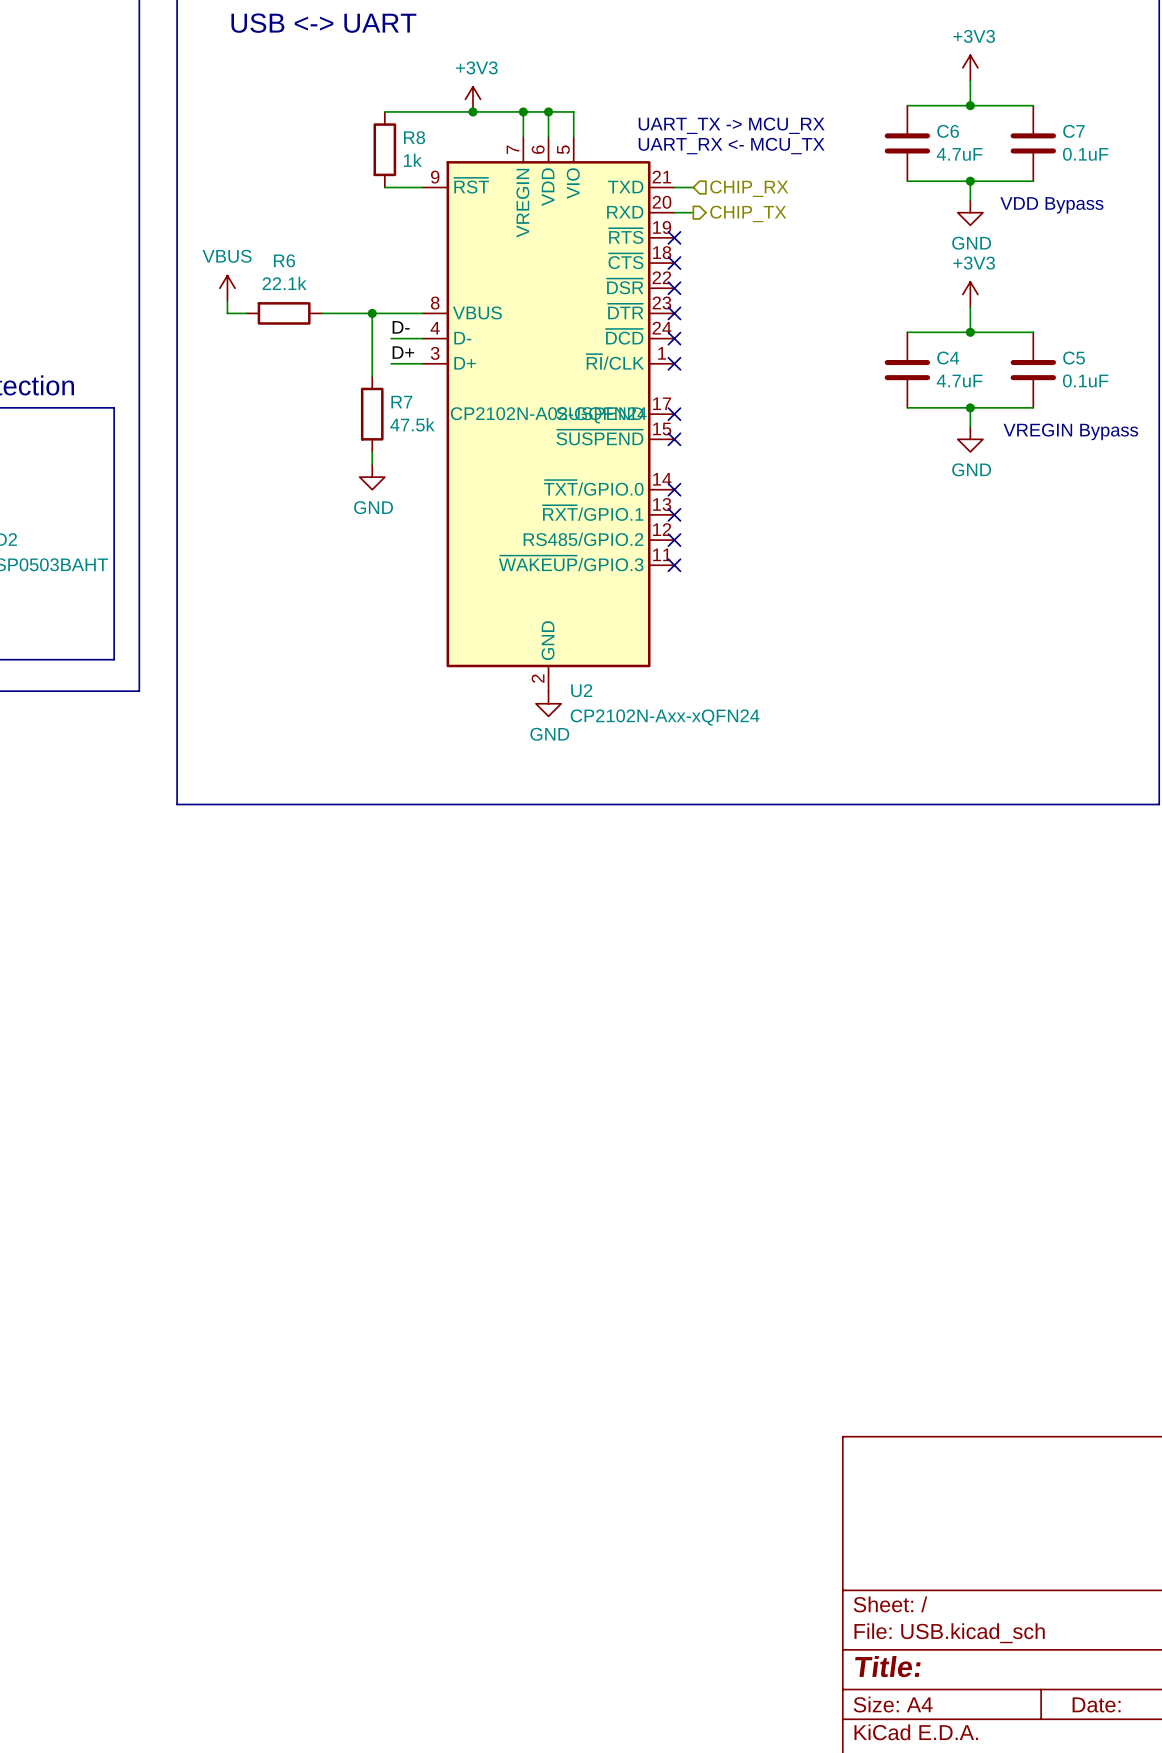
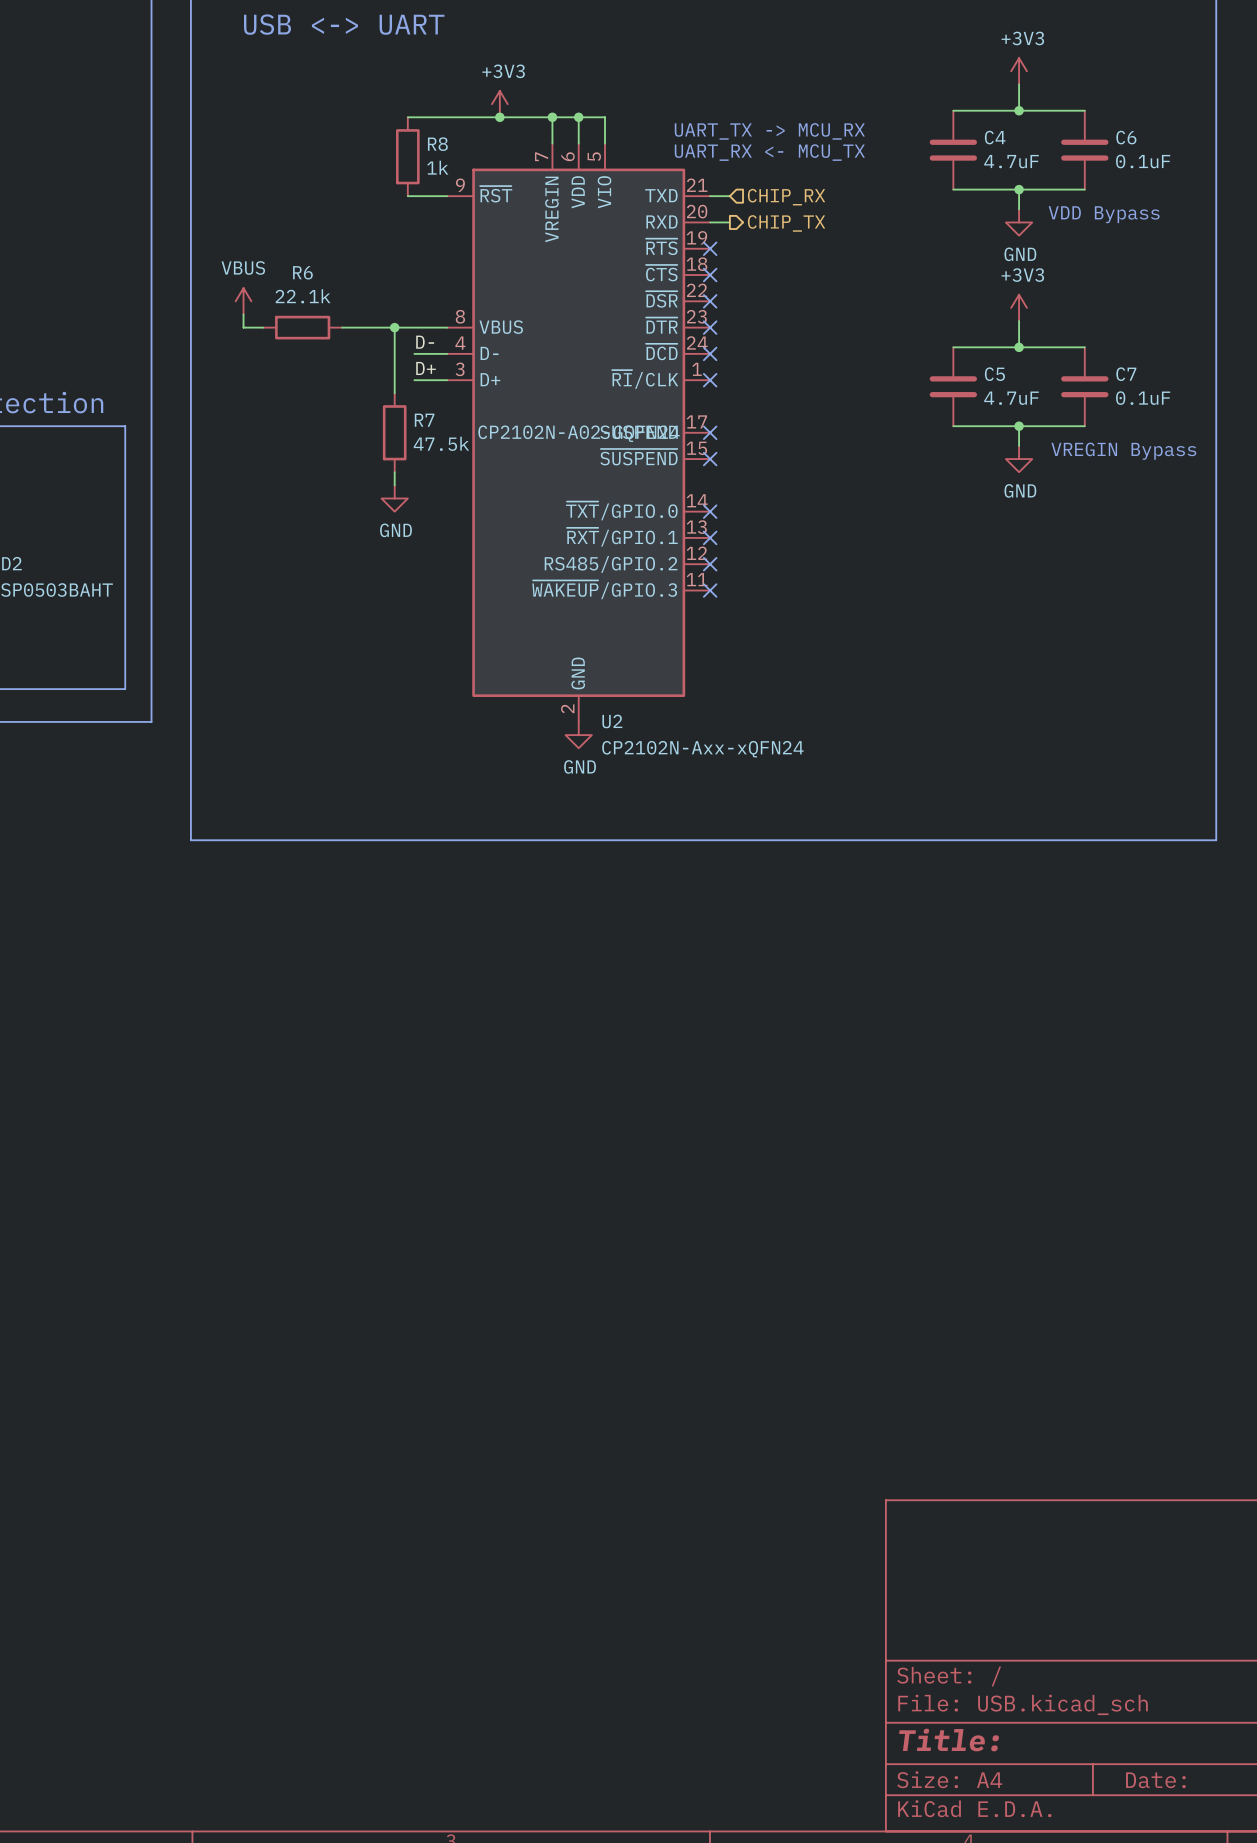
C6 name: C6 (948, 131) -> C4 (995, 137)
C7 name: C7 (1073, 131) -> C6 (1126, 137)
C4 name: C4 (948, 358) -> C5 (994, 374)
C5 name: C5 (1074, 358) -> C7 (1126, 374)

